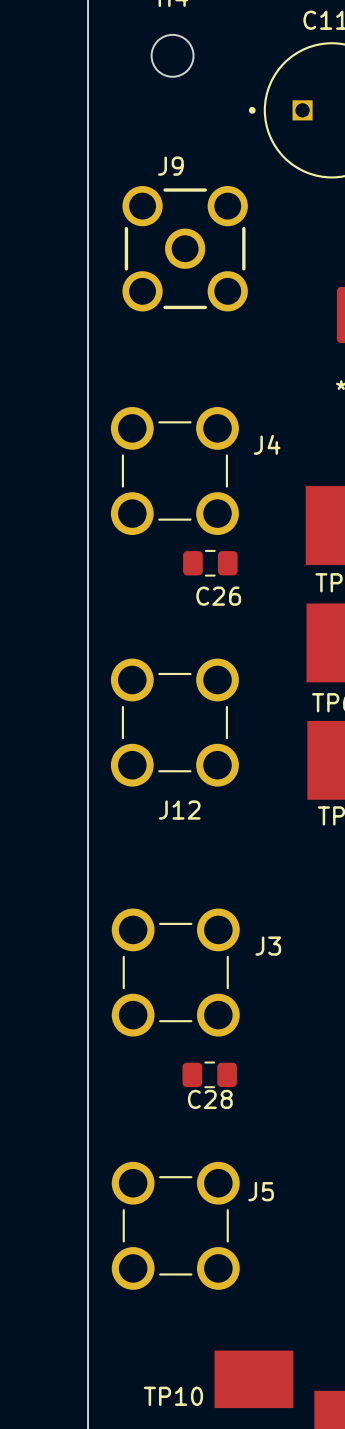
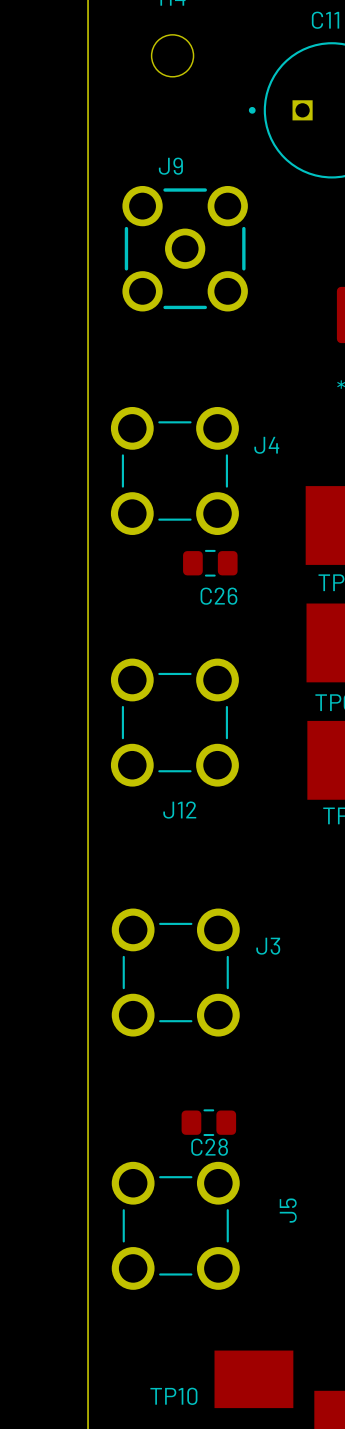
C28 position: (209, 1074) -> (208, 1122)
J5 name rotation: 0° (261, 1191) -> 90° counterclockwise (288, 1210)

